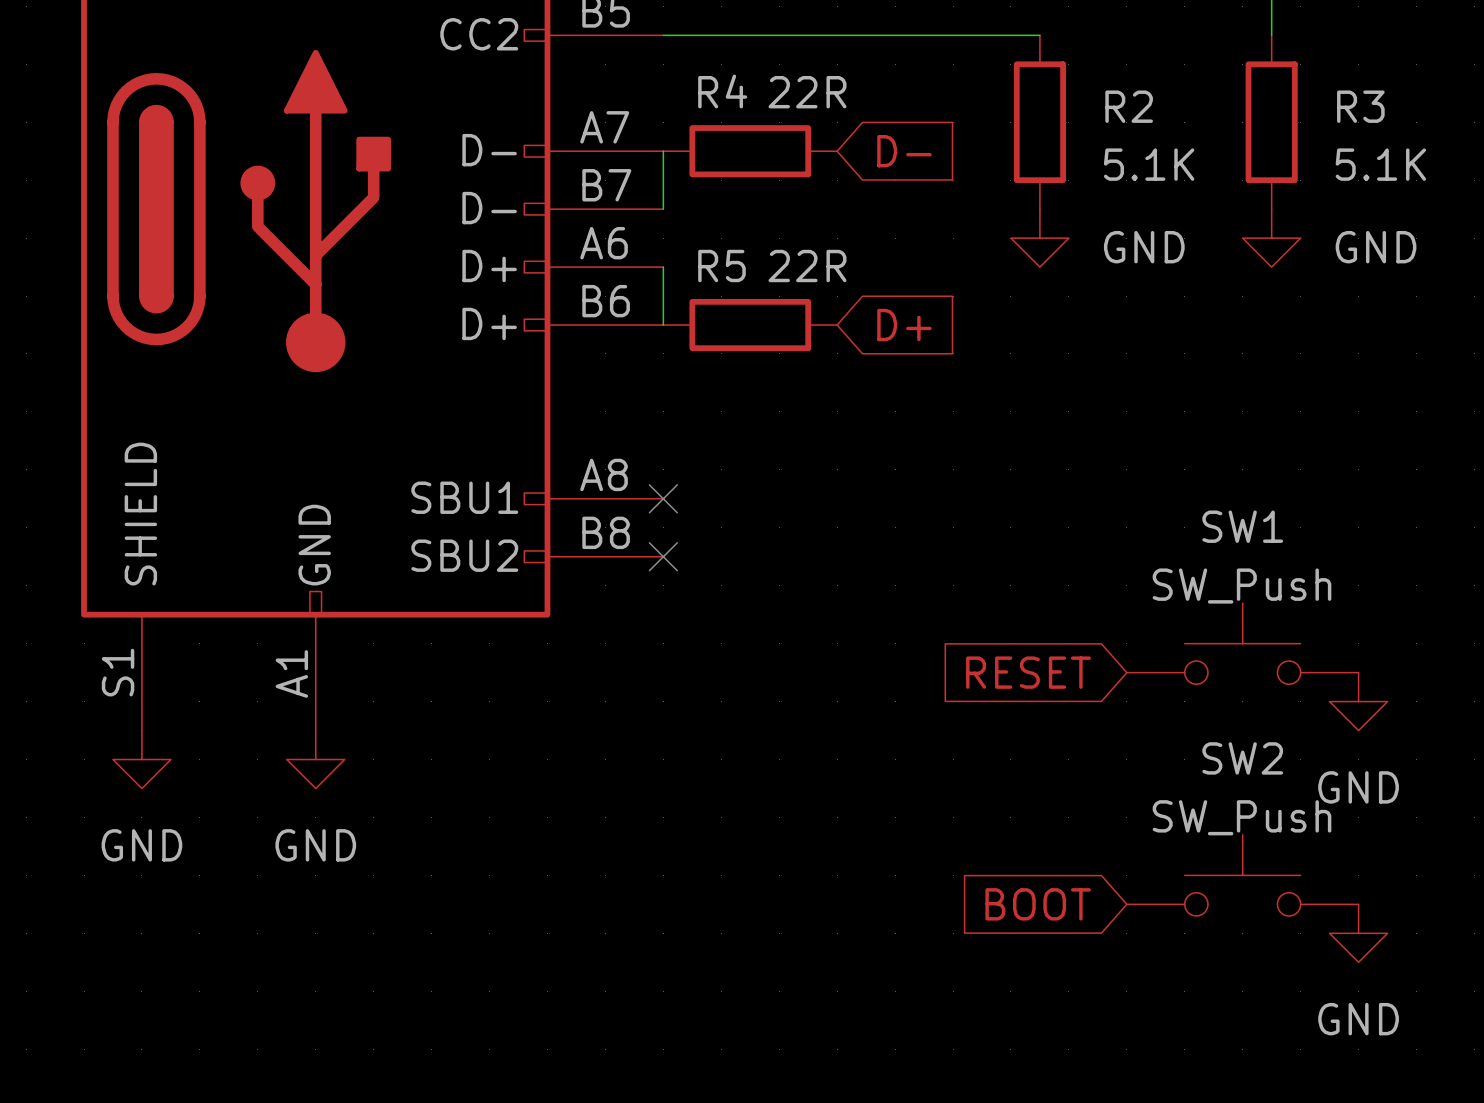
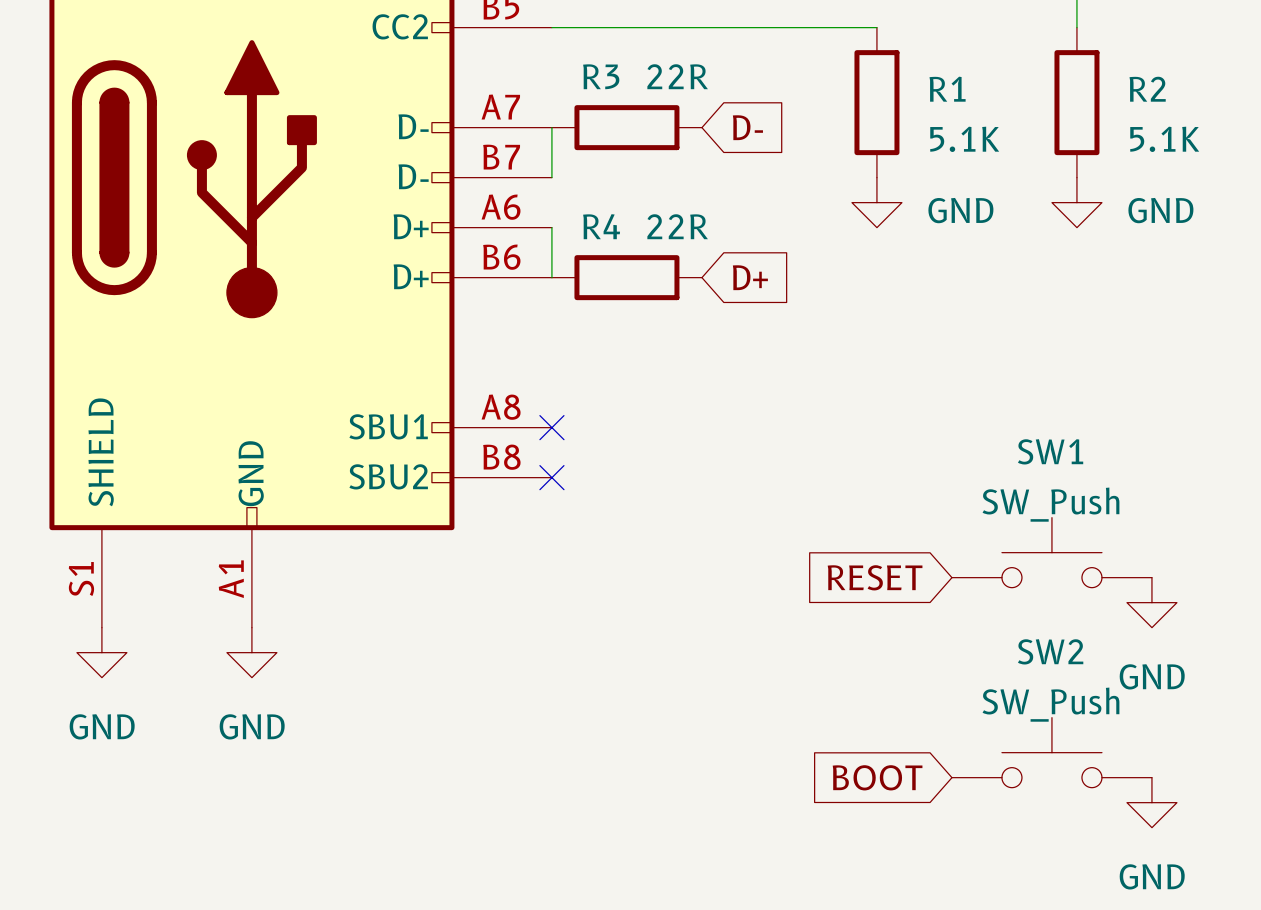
R4 name: R4 (722, 91) -> R3 (601, 76)
R2 name: R2 (1129, 106) -> R1 (947, 89)
R3 name: R3 (1360, 106) -> R2 (1147, 89)
R5 name: R5 (721, 266) -> R4 (601, 226)

